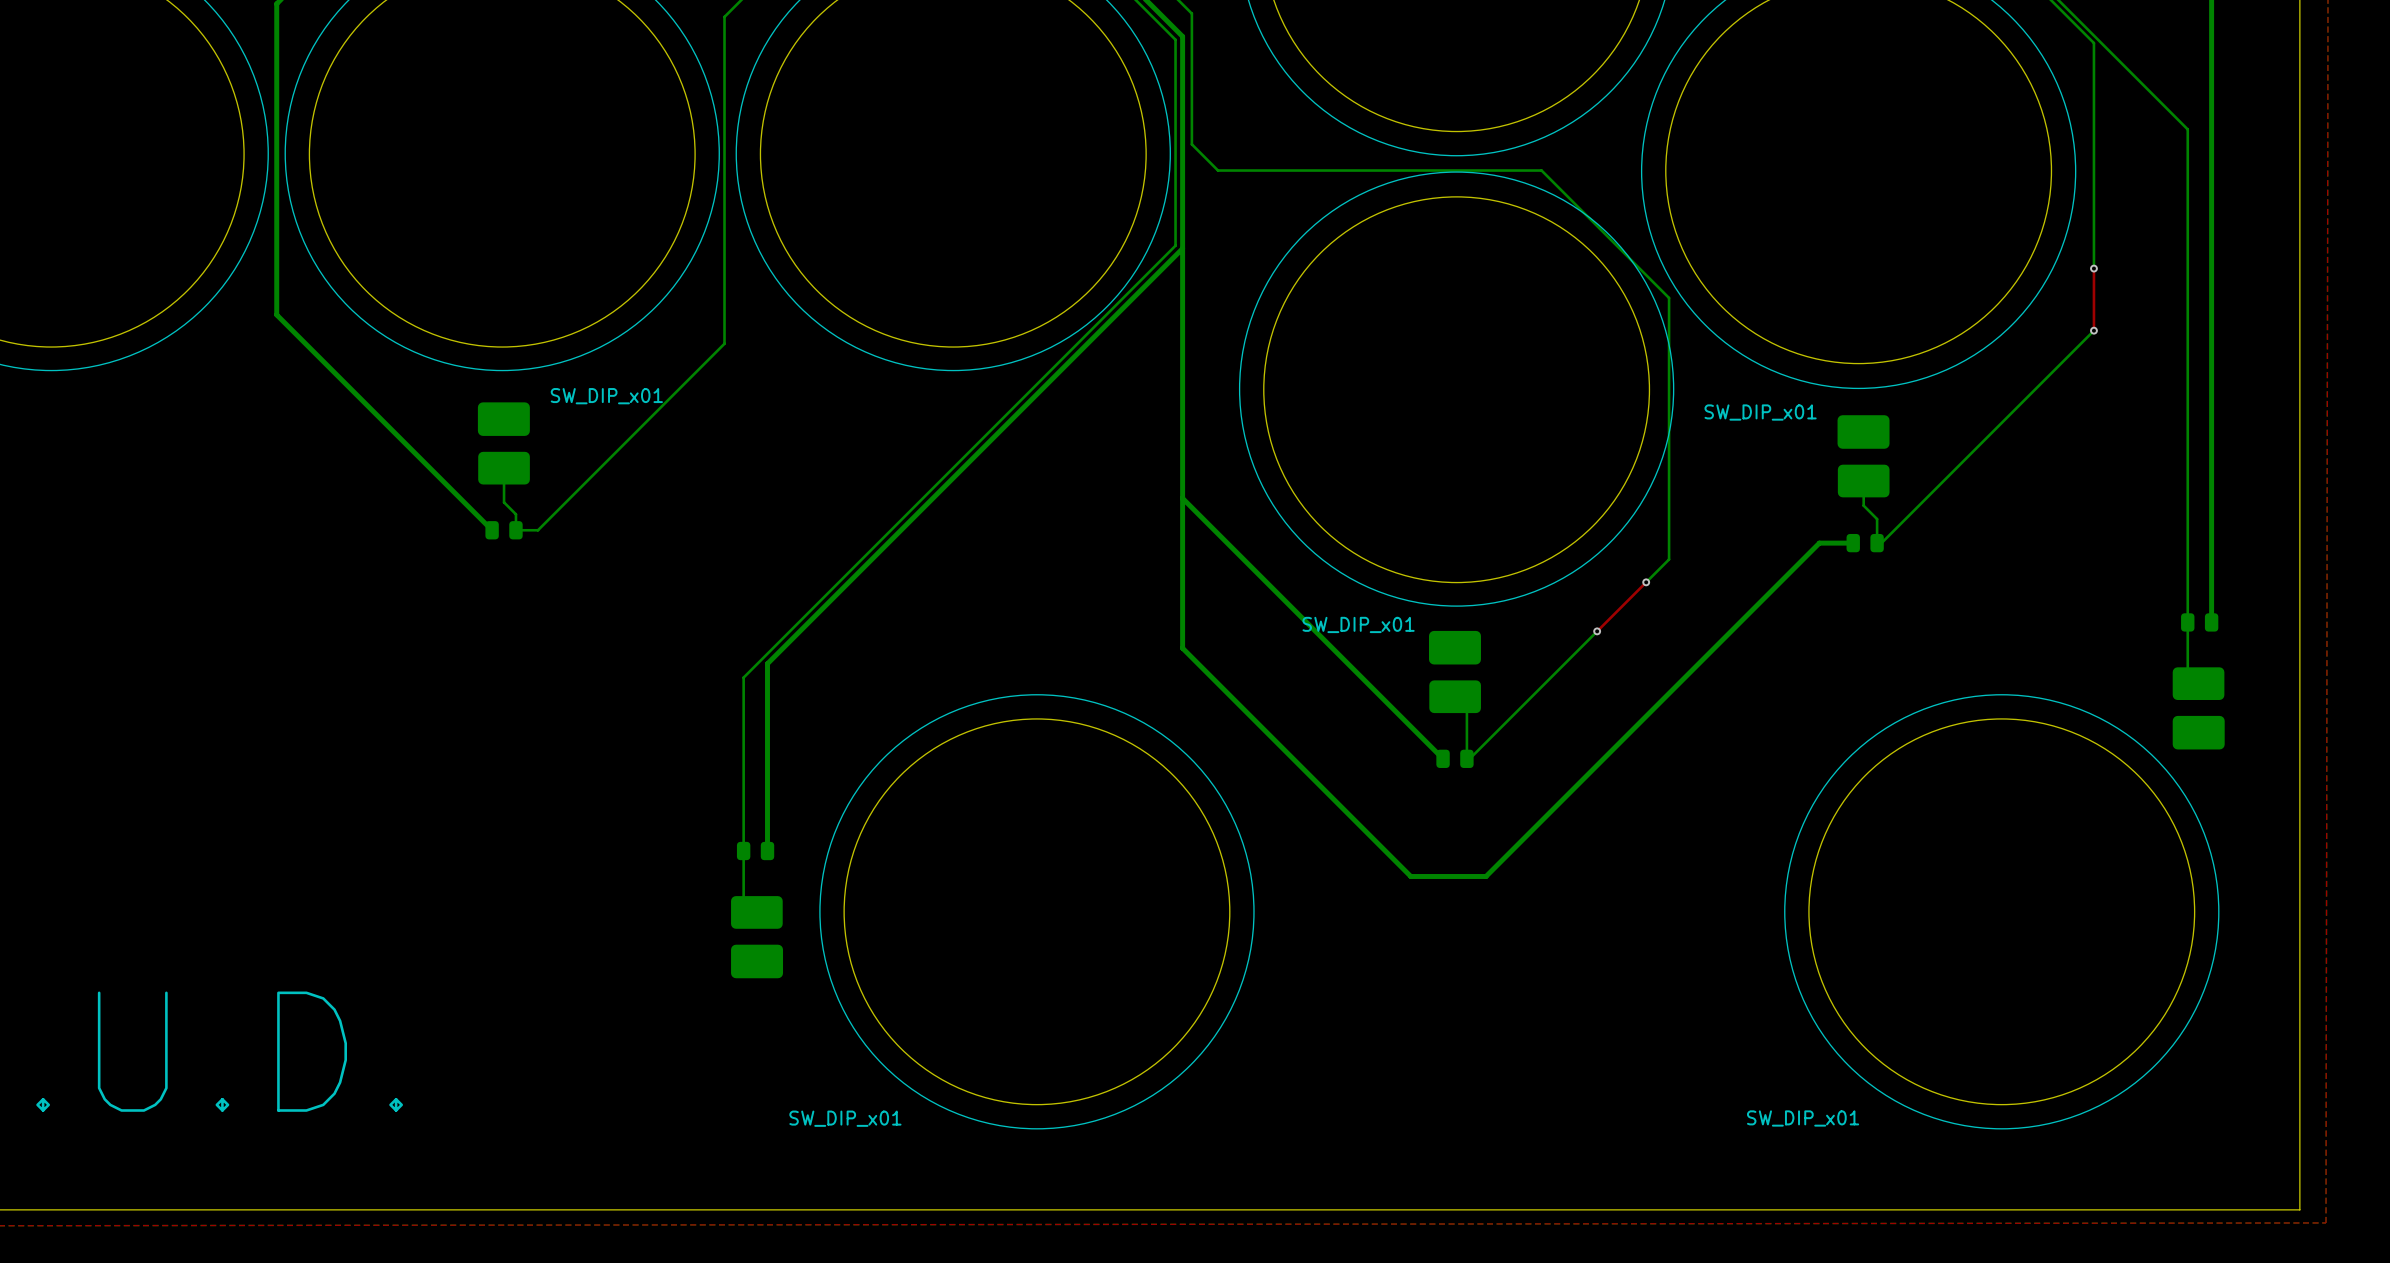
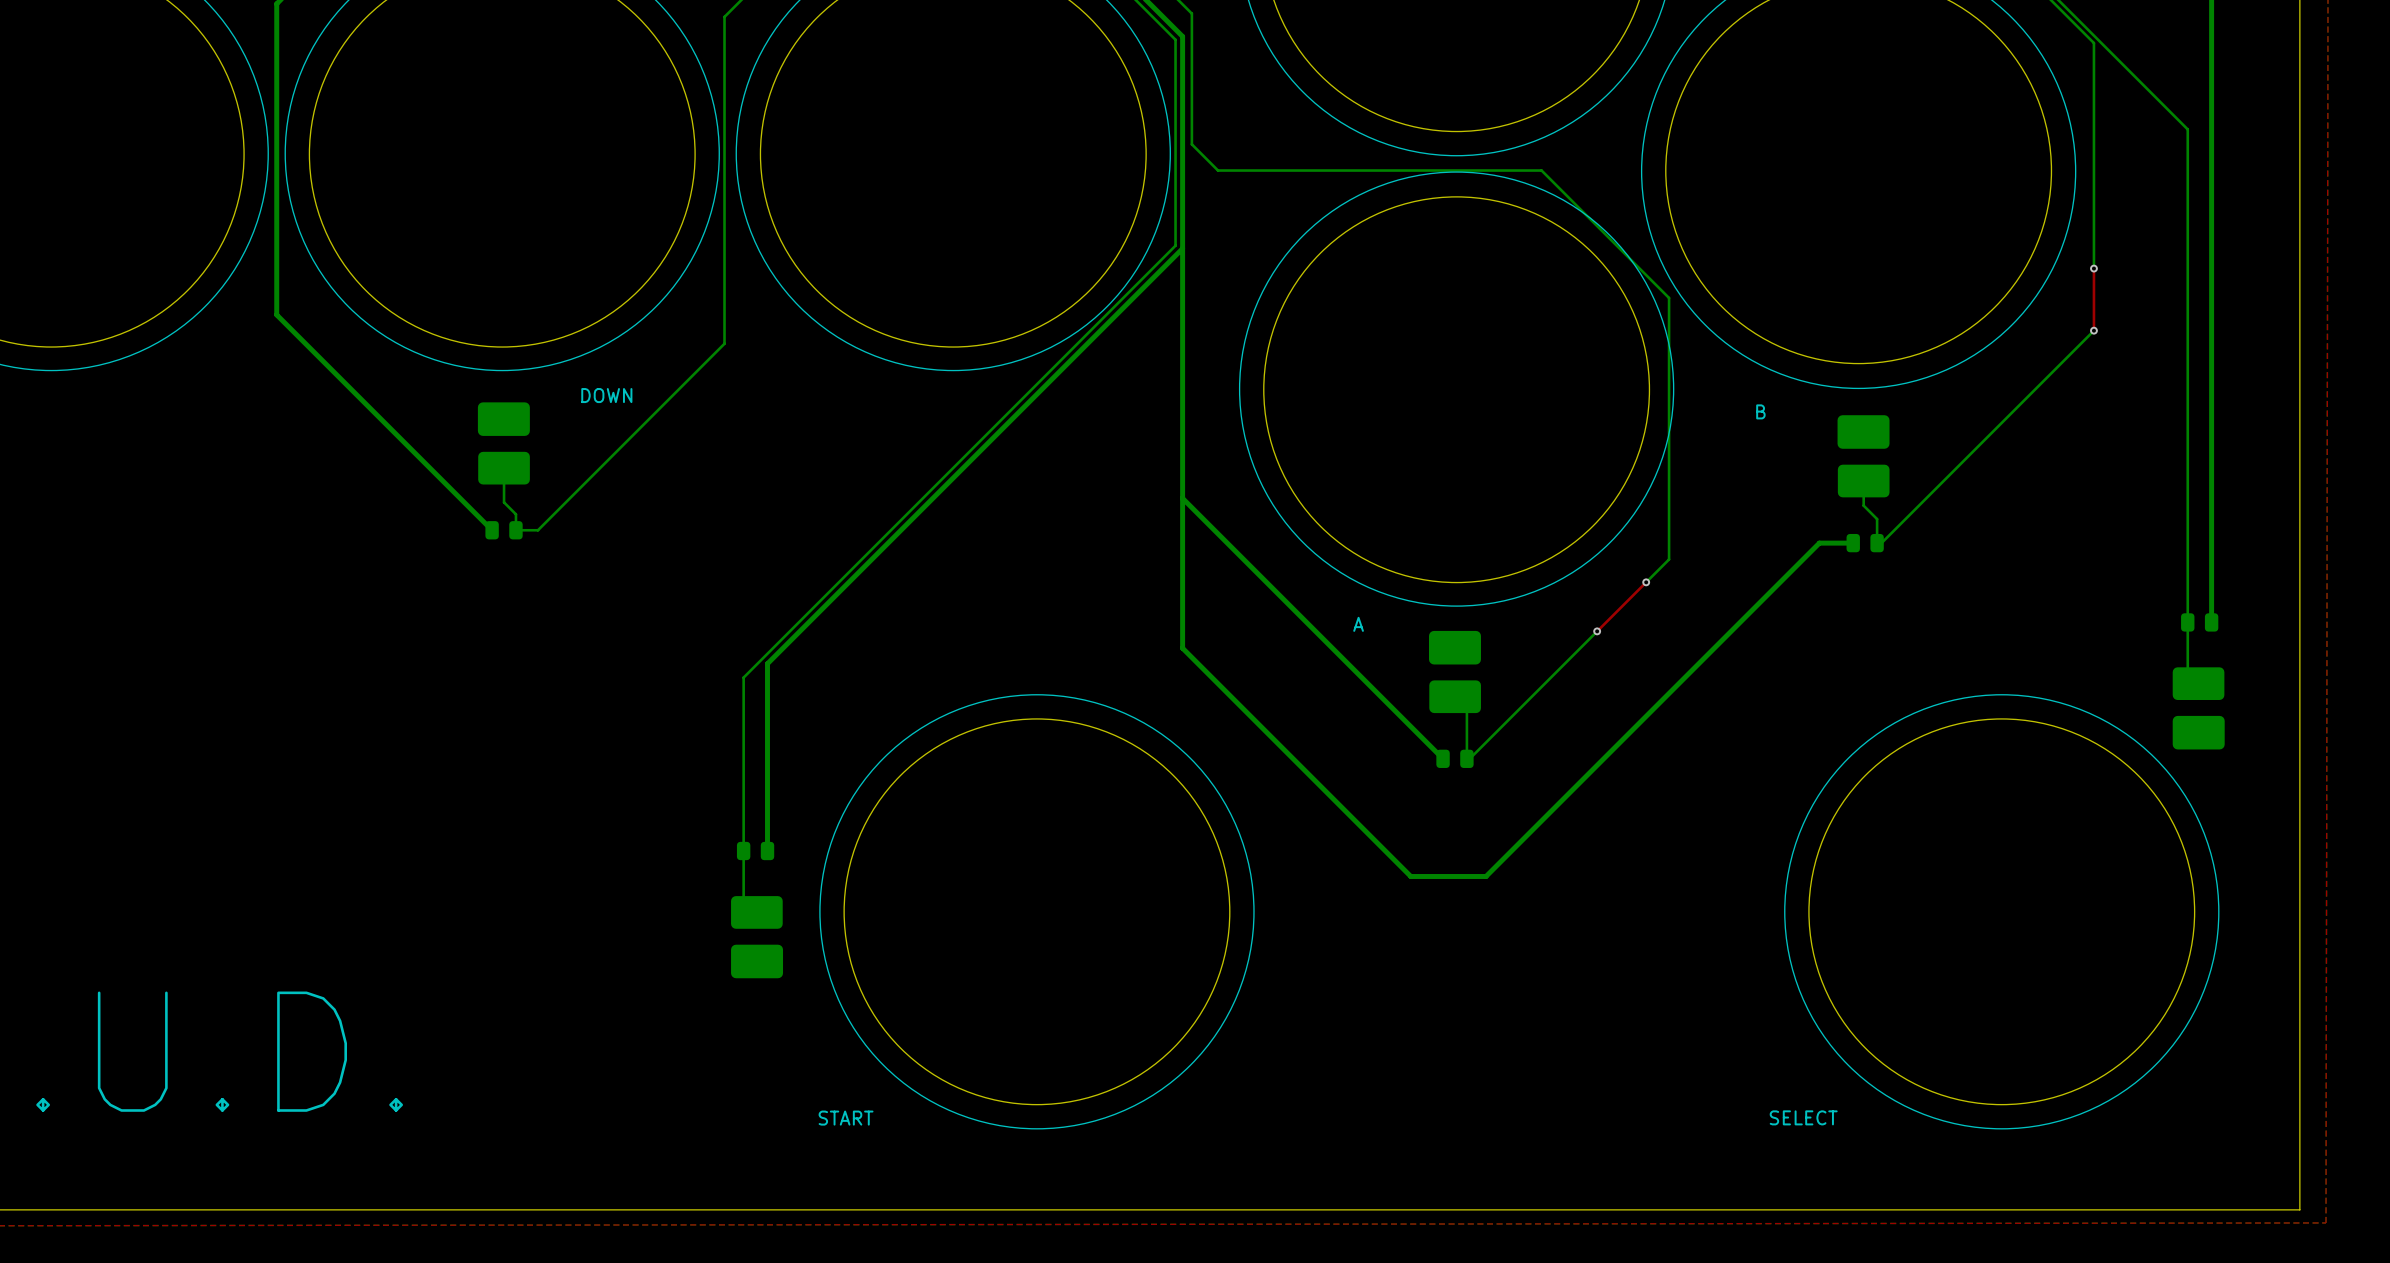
part value: SW_DIP_x01 (606, 396) -> DOWN (606, 395)
part value: SW_DIP_x01 (1760, 412) -> B (1760, 411)
part value: SW_DIP_x01 (1358, 624) -> A (1358, 624)
part value: SW_DIP_x01 (845, 1118) -> START (846, 1118)
part value: SW_DIP_x01 (1803, 1118) -> SELECT (1803, 1117)

